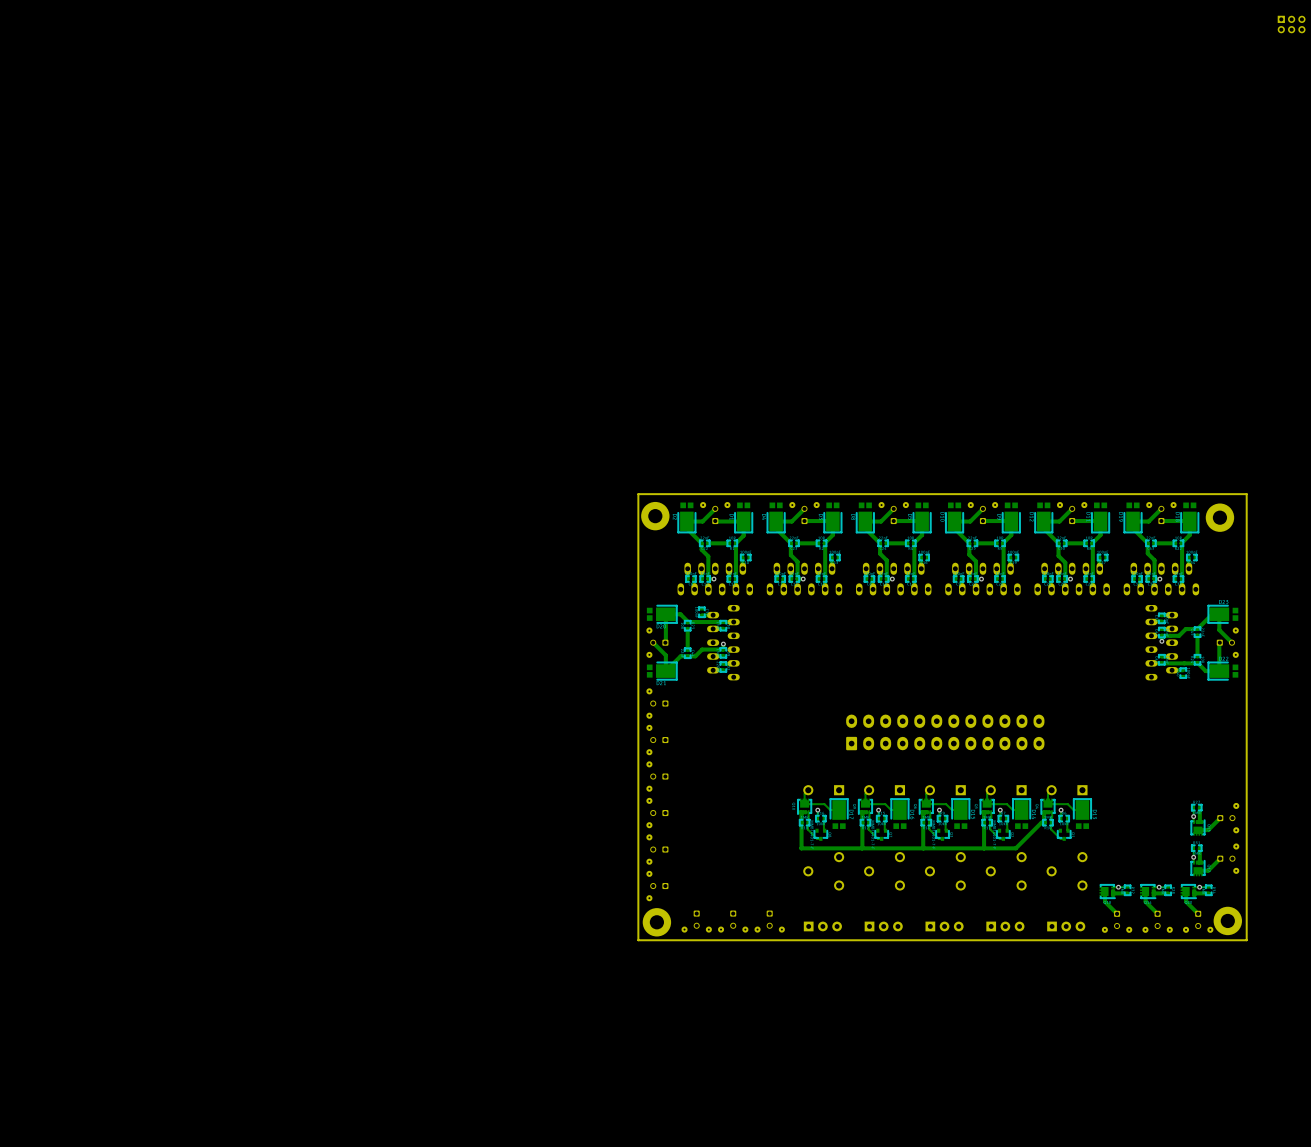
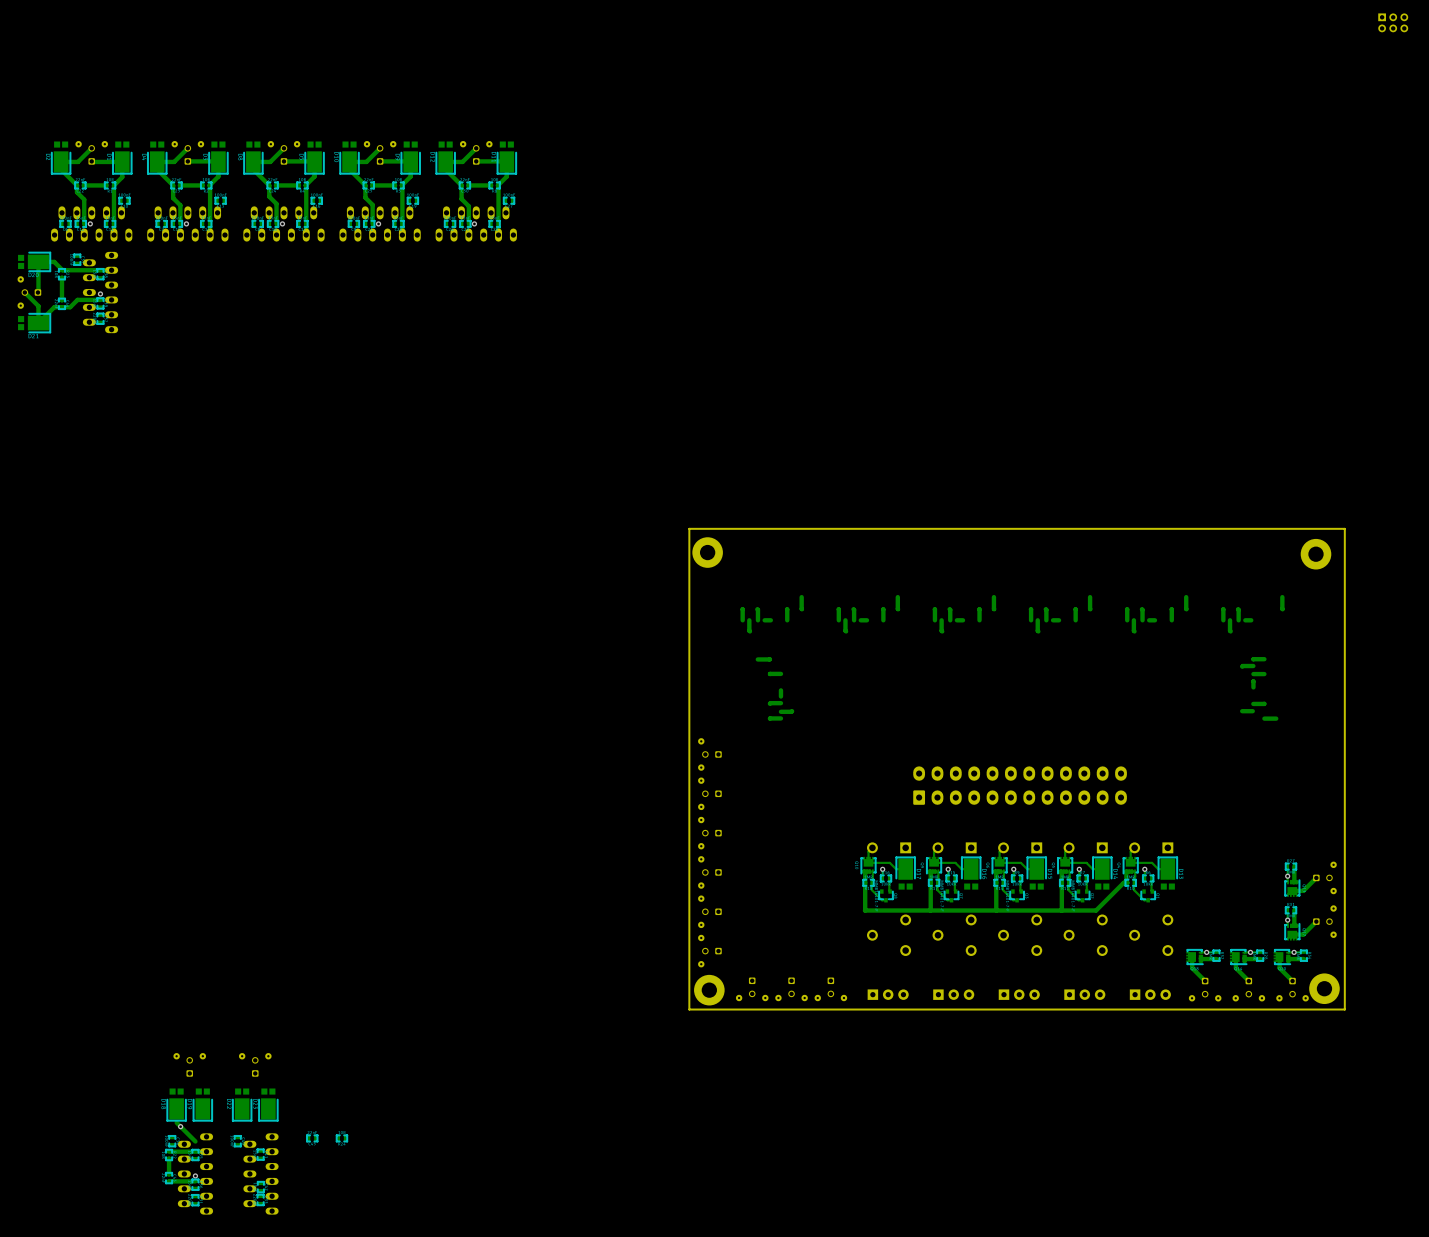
track: none -> (91, 148) (78, 161) (61, 161) (61, 169) (77, 185) (77, 192) (84, 199) (84, 223)
track: none -> (187, 148) (174, 161) (157, 161) (157, 169) (173, 185) (173, 198) (180, 205) (180, 223)
track: none -> (283, 148) (270, 161) (253, 161) (253, 169) (269, 185) (269, 196) (276, 203) (276, 223)
track: none -> (380, 148) (366, 161) (349, 161) (349, 169) (365, 185) (365, 197) (372, 204) (372, 223)
track: none -> (476, 148) (462, 161) (445, 161) (445, 169) (461, 185) (461, 199) (468, 206) (468, 223)
part: none -> (91, 153)
part: none -> (187, 153)
part: none -> (283, 153)
part: none -> (380, 153)
part: none -> (476, 153)
track: none -> (91, 161) (122, 161) (122, 177) (113, 185) (113, 234)
track: none -> (187, 161) (218, 161) (218, 176) (209, 185) (210, 235)
track: none -> (283, 161) (314, 161) (314, 176) (305, 185) (306, 235)
track: none -> (380, 161) (410, 161) (410, 176) (401, 185) (402, 235)
track: none -> (476, 161) (506, 161) (506, 176) (497, 185) (498, 235)
track: none -> (106, 185) (83, 185)
track: none -> (202, 185) (179, 185)
track: none -> (299, 185) (275, 185)
track: none -> (395, 185) (372, 185)
track: none -> (491, 185) (468, 185)
via: none -> (90, 223)
part: none -> (91, 223)
via: none -> (186, 223)
part: none -> (187, 223)
via: none -> (282, 223)
part: none -> (283, 223)
via: none -> (378, 223)
part: none -> (380, 223)
via: none -> (474, 223)
part: none -> (476, 223)
track: none -> (111, 270) (62, 270) (54, 261) (38, 261) (37, 292)
track: none -> (61, 277) (61, 300)
track: none -> (24, 292) (38, 306) (38, 323) (54, 307) (70, 307) (77, 299) (100, 299)
part: none -> (29, 292)
part: none -> (100, 292)
via: none -> (100, 293)
track: (715, 508) (702, 521) (686, 521) (686, 528) (701, 543) (701, 549) (708, 556) (708, 579) -> none
track: (804, 508) (791, 521) (776, 521) (776, 528) (790, 543) (790, 555) (797, 561) (797, 579) -> none
track: (893, 508) (881, 521) (865, 521) (865, 528) (880, 543) (880, 553) (886, 560) (886, 579) -> none
track: (982, 508) (970, 521) (954, 521) (954, 528) (969, 543) (969, 554) (976, 561) (976, 579) -> none
track: (1072, 508) (1059, 521) (1043, 521) (1043, 528) (1058, 543) (1058, 555) (1065, 562) (1065, 579) -> none
track: (1161, 508) (1148, 521) (1133, 521) (1133, 528) (1147, 543) (1147, 553) (1154, 560) (1154, 579) -> none
part: (715, 513) -> none
part: (804, 513) -> none
part: (893, 513) -> none
part: (982, 513) -> none
part: (1072, 513) -> none
part: (1161, 513) -> none
part position: (686, 517) -> (61, 157)
part position: (743, 517) -> (122, 157)
part position: (776, 517) -> (157, 157)
part position: (832, 517) -> (218, 157)
part position: (865, 517) -> (253, 157)
part position: (922, 517) -> (314, 157)
part position: (954, 517) -> (349, 157)
part position: (1011, 517) -> (410, 157)
part position: (1043, 517) -> (445, 157)
part position: (1100, 517) -> (506, 157)
part position: (1133, 517) -> (202, 1104)
part position: (1189, 517) -> (176, 1104)
track: (715, 521) (743, 521) (743, 535) (735, 543) (735, 588) -> none
track: (804, 521) (832, 521) (832, 535) (824, 543) (825, 589) -> none
track: (893, 521) (922, 521) (922, 535) (913, 543) (914, 589) -> none
track: (982, 521) (1011, 521) (1011, 535) (1003, 543) (1003, 589) -> none
track: (1072, 521) (1100, 521) (1100, 535) (1092, 543) (1092, 589) -> none
track: (1161, 521) (1189, 521) (1189, 535) (1181, 543) (1182, 589) -> none
part position: (704, 543) -> (80, 185)
track: (729, 543) (707, 543) -> none
part position: (732, 543) -> (110, 185)
part position: (793, 543) -> (176, 185)
track: (818, 543) (797, 543) -> none
part position: (821, 543) -> (206, 185)
part position: (883, 543) -> (272, 185)
track: (907, 543) (886, 543) -> none
part position: (910, 543) -> (302, 185)
part position: (972, 543) -> (368, 185)
track: (996, 543) (975, 543) -> none
part position: (999, 543) -> (398, 185)
part position: (1061, 543) -> (464, 185)
track: (1086, 543) (1064, 543) -> none
part position: (1089, 543) -> (494, 185)
part rotation: 0° (1150, 543) -> 90° counterclockwise (169, 1178)
part position: (1150, 543) -> (169, 1178)
track: (1175, 543) (1153, 543) -> none
part rotation: 0° (1178, 543) -> 90° counterclockwise (169, 1154)
part position: (1178, 543) -> (169, 1154)
part position: (745, 557) -> (124, 200)
part position: (834, 557) -> (220, 200)
part position: (924, 557) -> (316, 200)
part position: (1013, 557) -> (412, 200)
part position: (1102, 557) -> (509, 200)
part rotation: 0° (1191, 557) -> 90° counterclockwise (172, 1141)
part position: (1191, 557) -> (172, 1141)
part position: (690, 579) -> (65, 223)
part position: (705, 579) -> (80, 223)
via: (713, 579) -> none
part: (715, 579) -> none
part position: (732, 579) -> (110, 223)
part position: (780, 579) -> (161, 223)
part position: (794, 579) -> (176, 223)
via: (803, 579) -> none
part: (804, 579) -> none
part position: (821, 579) -> (206, 223)
part position: (869, 579) -> (257, 223)
part position: (883, 579) -> (273, 223)
via: (892, 579) -> none
part: (893, 579) -> none
part position: (910, 579) -> (302, 223)
part position: (958, 579) -> (353, 223)
part position: (972, 579) -> (369, 223)
via: (981, 579) -> none
part: (982, 579) -> none
part position: (999, 579) -> (398, 223)
part position: (1047, 579) -> (450, 223)
part position: (1062, 579) -> (465, 223)
via: (1070, 579) -> none
part: (1072, 579) -> none
part position: (1089, 579) -> (494, 223)
part rotation: 0° (1137, 579) -> 90° counterclockwise (195, 1200)
part position: (1137, 579) -> (195, 1200)
part rotation: 0° (1151, 579) -> 90° counterclockwise (195, 1184)
part position: (1151, 579) -> (195, 1184)
via: (1159, 579) -> none
part: (1161, 579) -> none
part rotation: 0° (1178, 579) -> 90° counterclockwise (195, 1155)
part position: (1178, 579) -> (195, 1155)
part position: (701, 612) -> (77, 259)
part position: (661, 614) -> (34, 261)
part rotation: 0° (1223, 614) -> 90° counterclockwise (268, 1104)
part position: (1223, 614) -> (268, 1104)
part rotation: 0° (1161, 618) -> 180° (260, 1199)
part position: (1161, 618) -> (260, 1199)
track: (688, 622) (680, 614) (665, 614) (665, 642) -> none
track: (733, 622) (688, 622) -> none
part position: (687, 625) -> (61, 274)
part position: (723, 625) -> (100, 274)
track: (687, 628) (687, 650) -> none
part rotation: 0° (1161, 632) -> 180° (260, 1187)
part position: (1161, 632) -> (260, 1187)
part rotation: 0° (1197, 632) -> 90° counterclockwise (312, 1138)
part position: (1197, 632) -> (312, 1138)
track: (1162, 635) (1179, 635) (1185, 629) (1197, 629) (1212, 614) (1219, 614) (1219, 630) (1231, 642) -> none
track: (1197, 635) (1197, 656) -> none
via: (1161, 641) -> none
track: (653, 642) (665, 655) (665, 671) (680, 656) (695, 656) (702, 649) (723, 649) -> none
part: (657, 642) -> none
part: (723, 642) -> none
part: (1161, 642) -> none
track: (1219, 642) (1219, 671) (1205, 671) (1197, 662) -> none
part: (1227, 642) -> none
via: (723, 644) -> none
part position: (723, 652) -> (100, 303)
part position: (687, 653) -> (61, 303)
part rotation: 0° (1161, 659) -> 180° (260, 1154)
part position: (1161, 659) -> (260, 1154)
part rotation: 0° (1197, 659) -> 90° counterclockwise (341, 1138)
part position: (1197, 659) -> (341, 1138)
track: (1198, 663) (1161, 663) -> none
part position: (723, 667) -> (100, 318)
part position: (661, 671) -> (34, 323)
part rotation: 0° (1223, 671) -> 90° counterclockwise (242, 1104)
part position: (1223, 671) -> (242, 1104)
part rotation: 0° (1183, 673) -> 180° (237, 1141)
part position: (1183, 673) -> (237, 1141)
part: none -> (189, 1065)
part: none -> (255, 1065)
track: none -> (176, 1122) (195, 1141)
via: none -> (180, 1126)
track: none -> (206, 1151) (169, 1151)
track: none -> (169, 1158) (169, 1174)
part: none -> (195, 1173)
part: none -> (260, 1173)
via: none -> (195, 1175)
track: none -> (195, 1181) (169, 1181)

